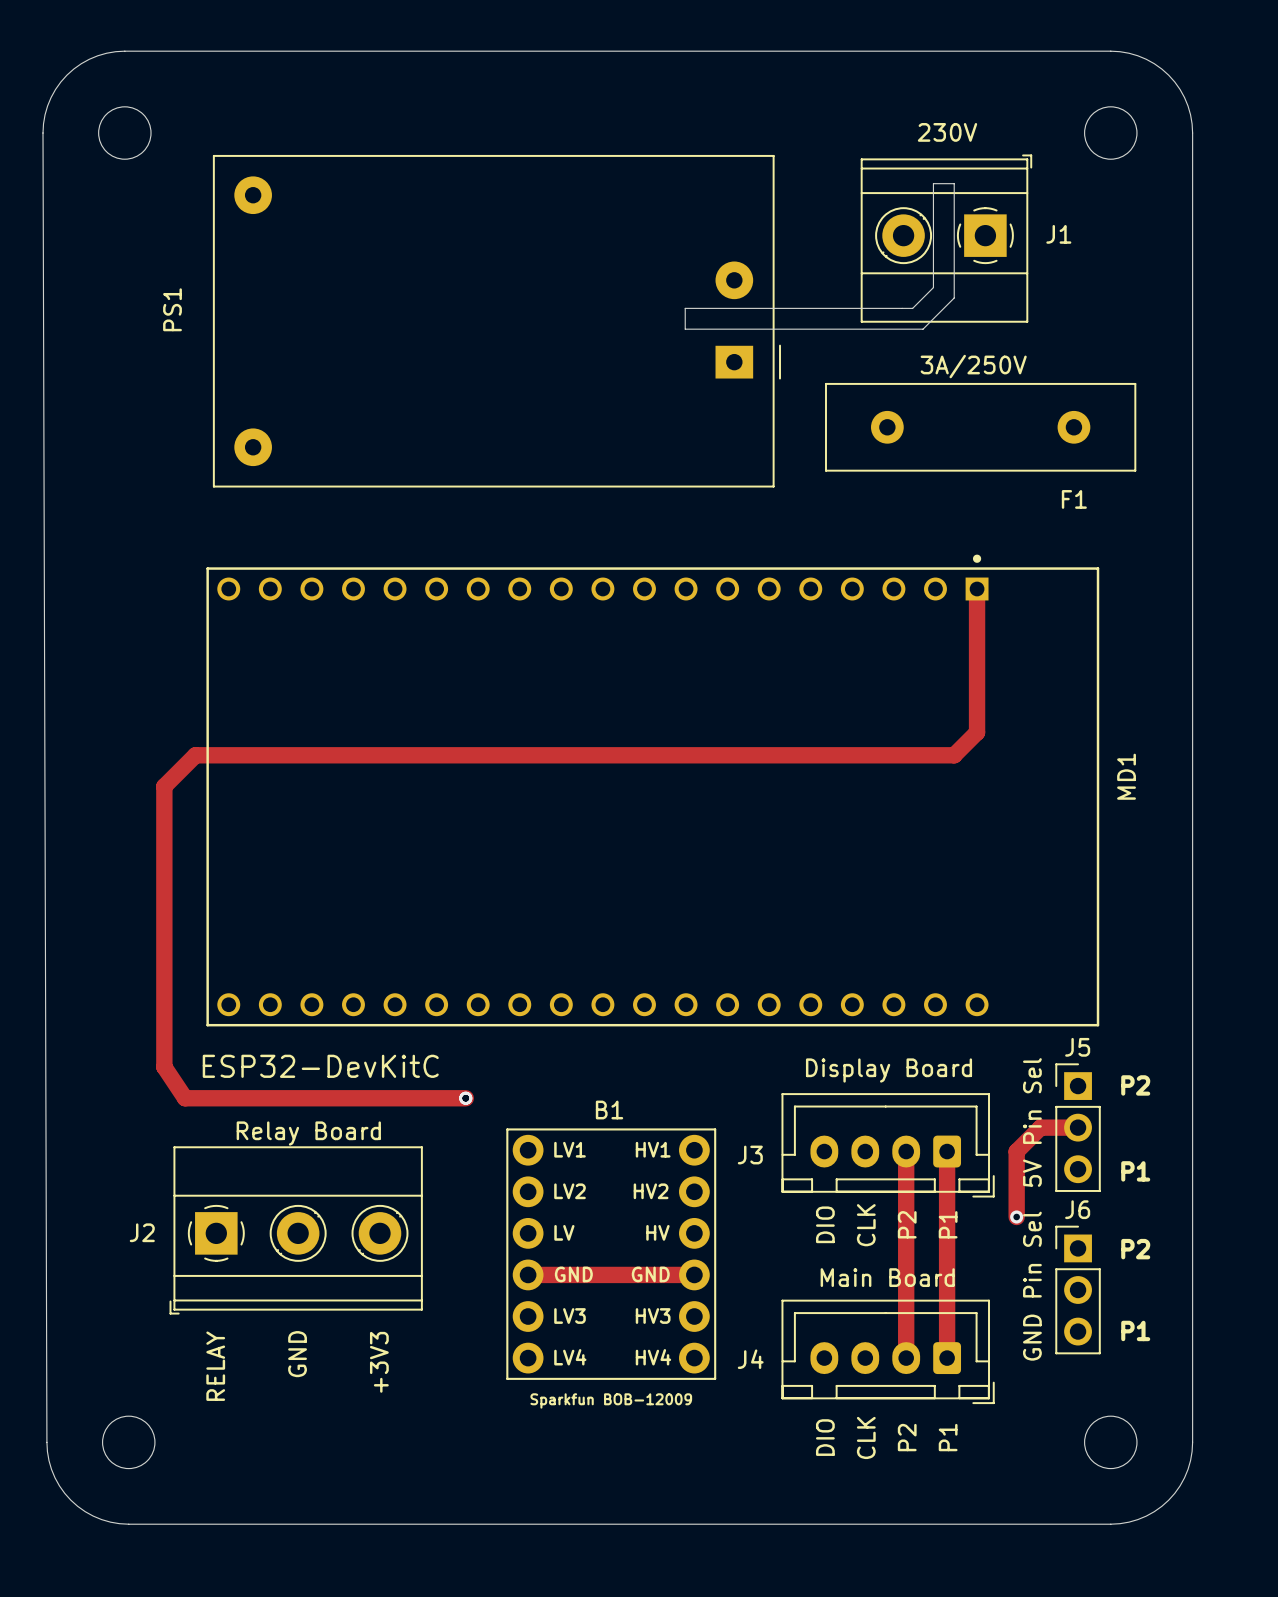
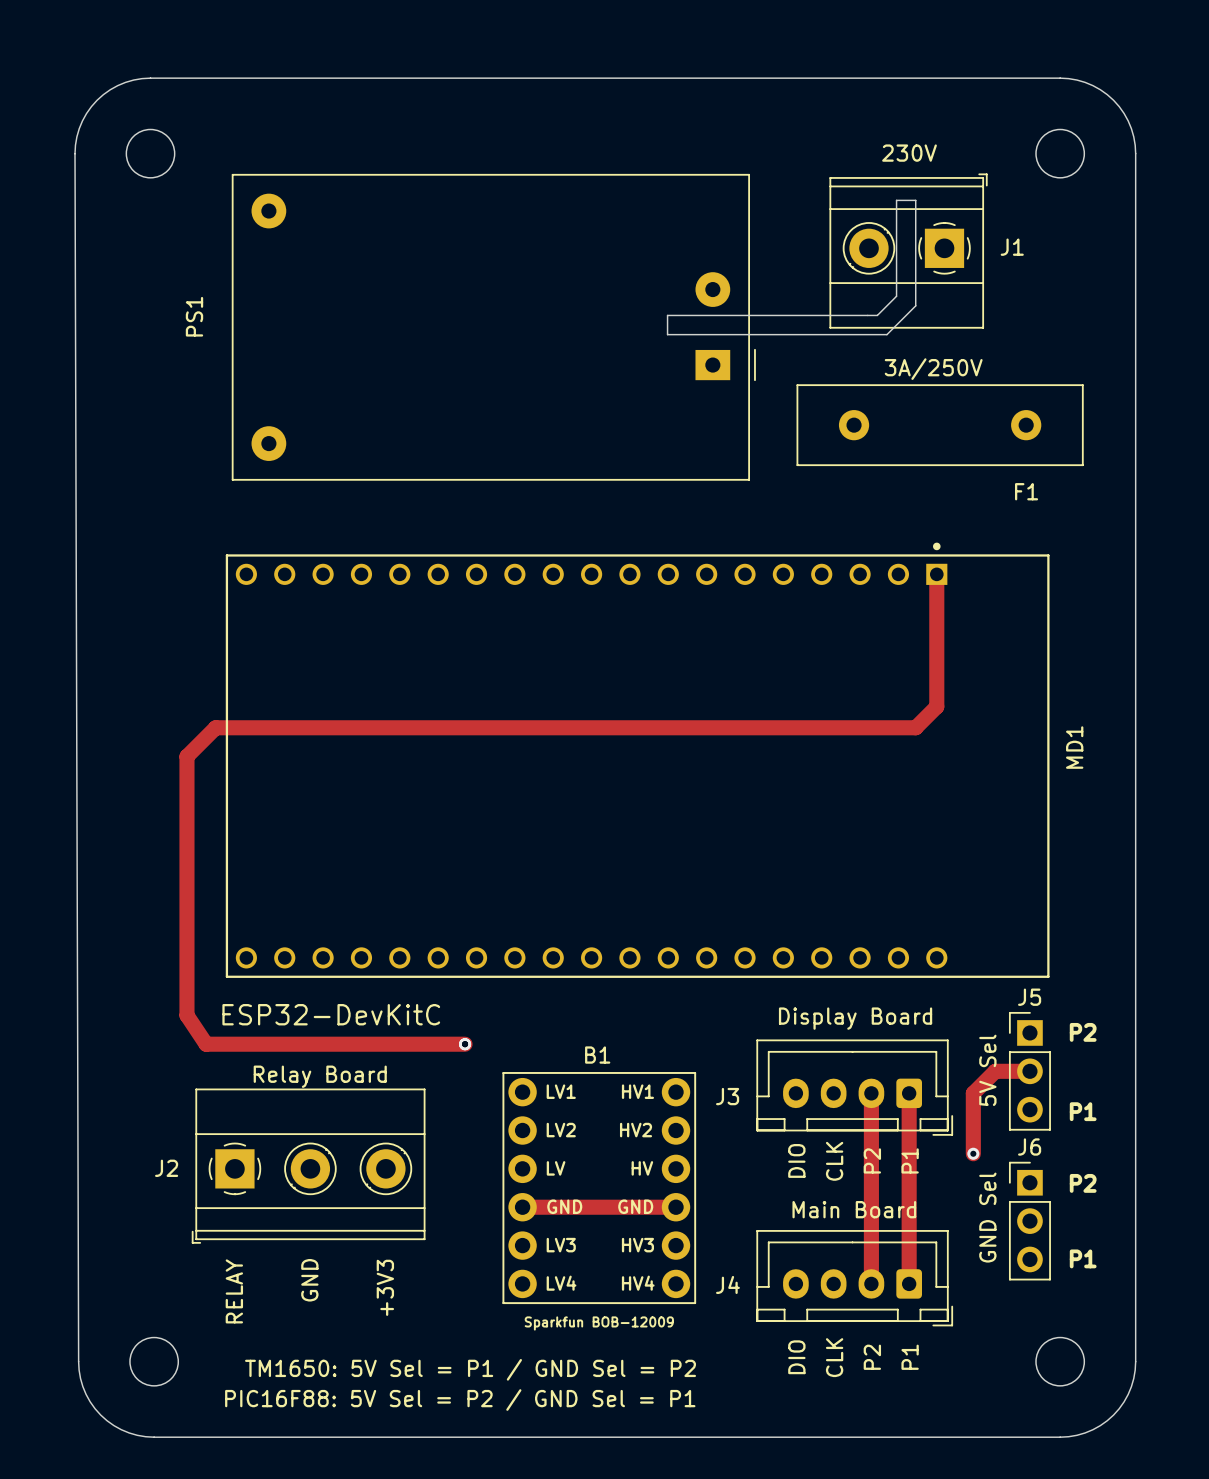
J5 value: 5V Pin Sel (1032, 1122) -> none
J5 text: none -> 5V Sel (987, 1070)
J6 text: none -> GND Sel (987, 1217)
J6 value: GND Pin Sel (1032, 1286) -> none
text: none -> TM1650: 5V Sel = P1 / GND Sel = P2 (470, 1369)
text: none -> PIC16F88: 5V Sel = P2 / GND Sel = P1 (460, 1400)

